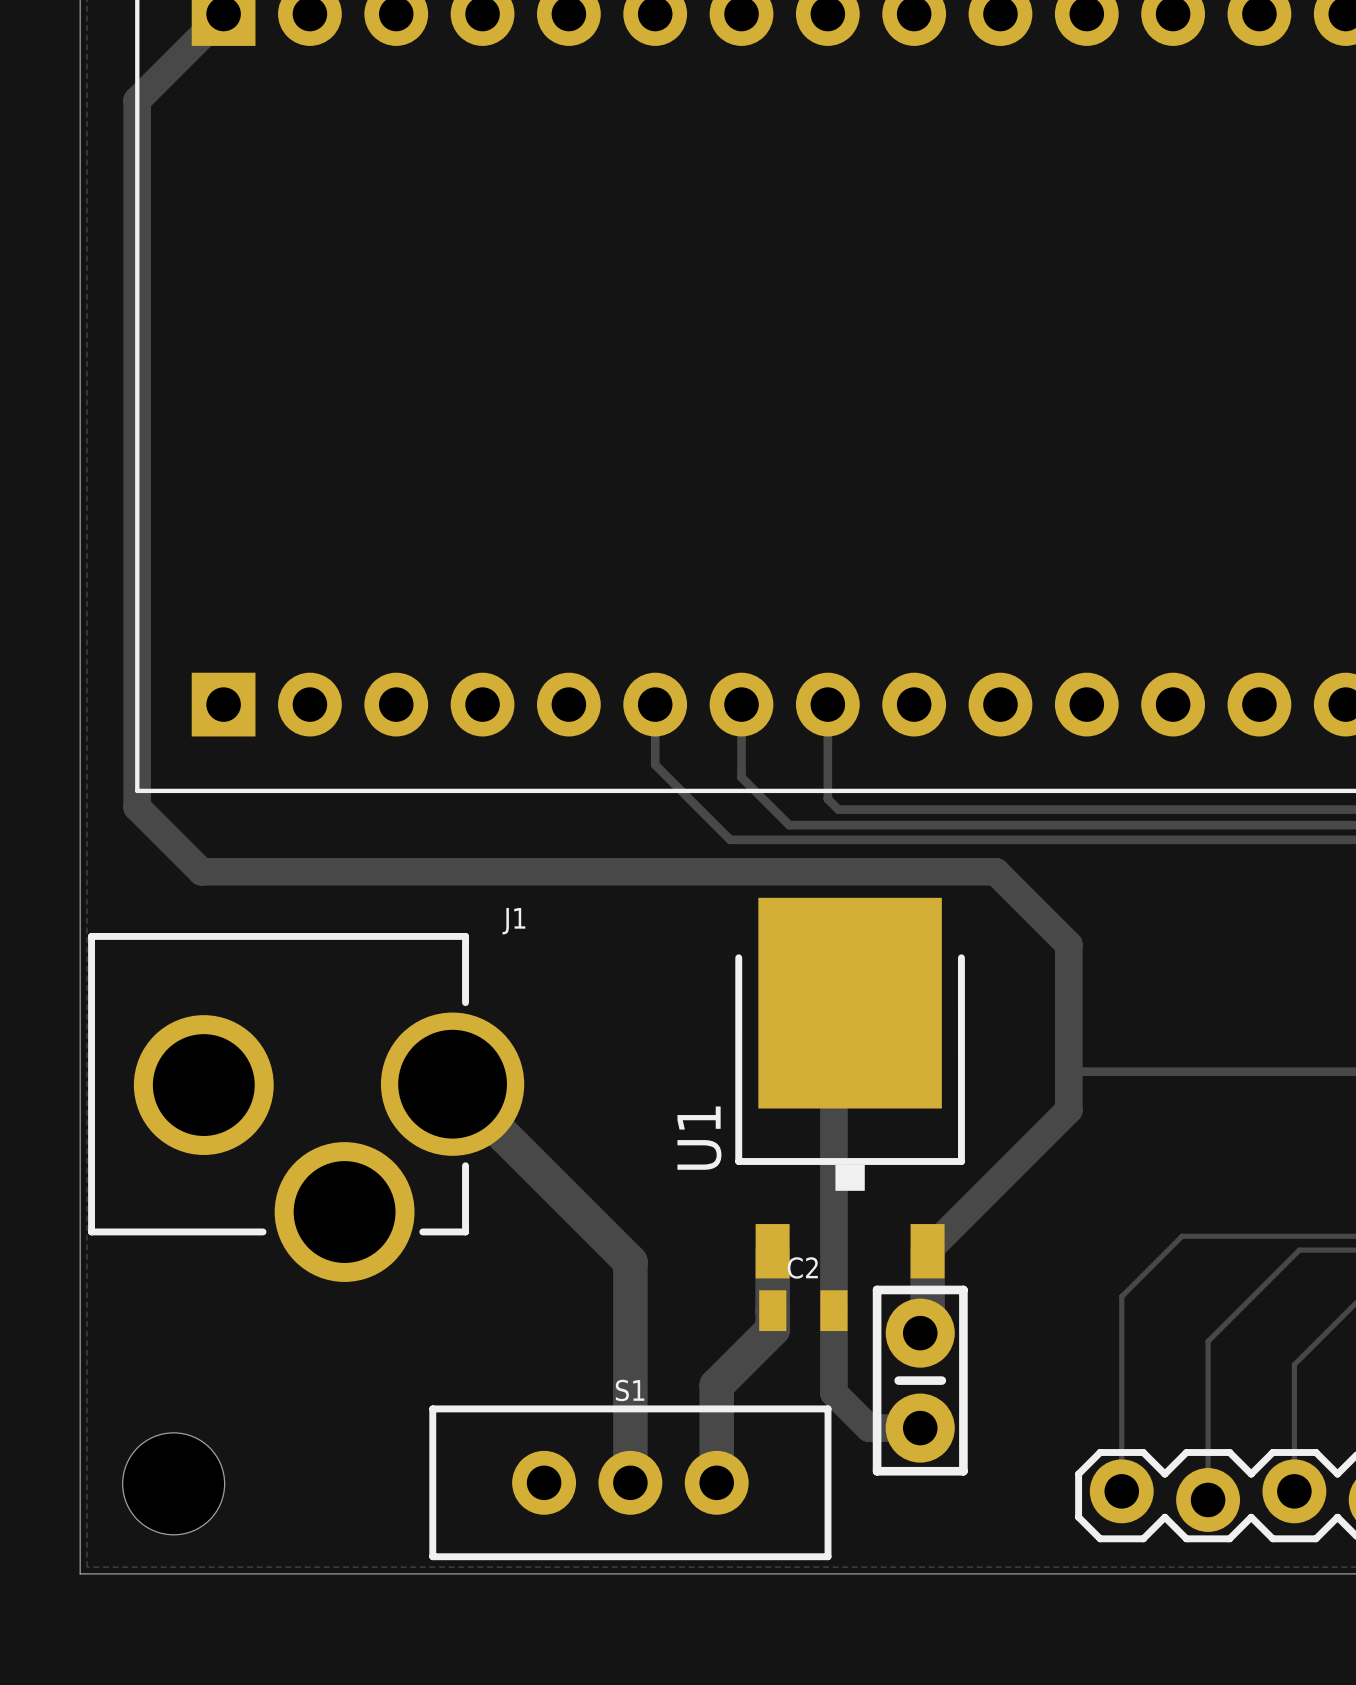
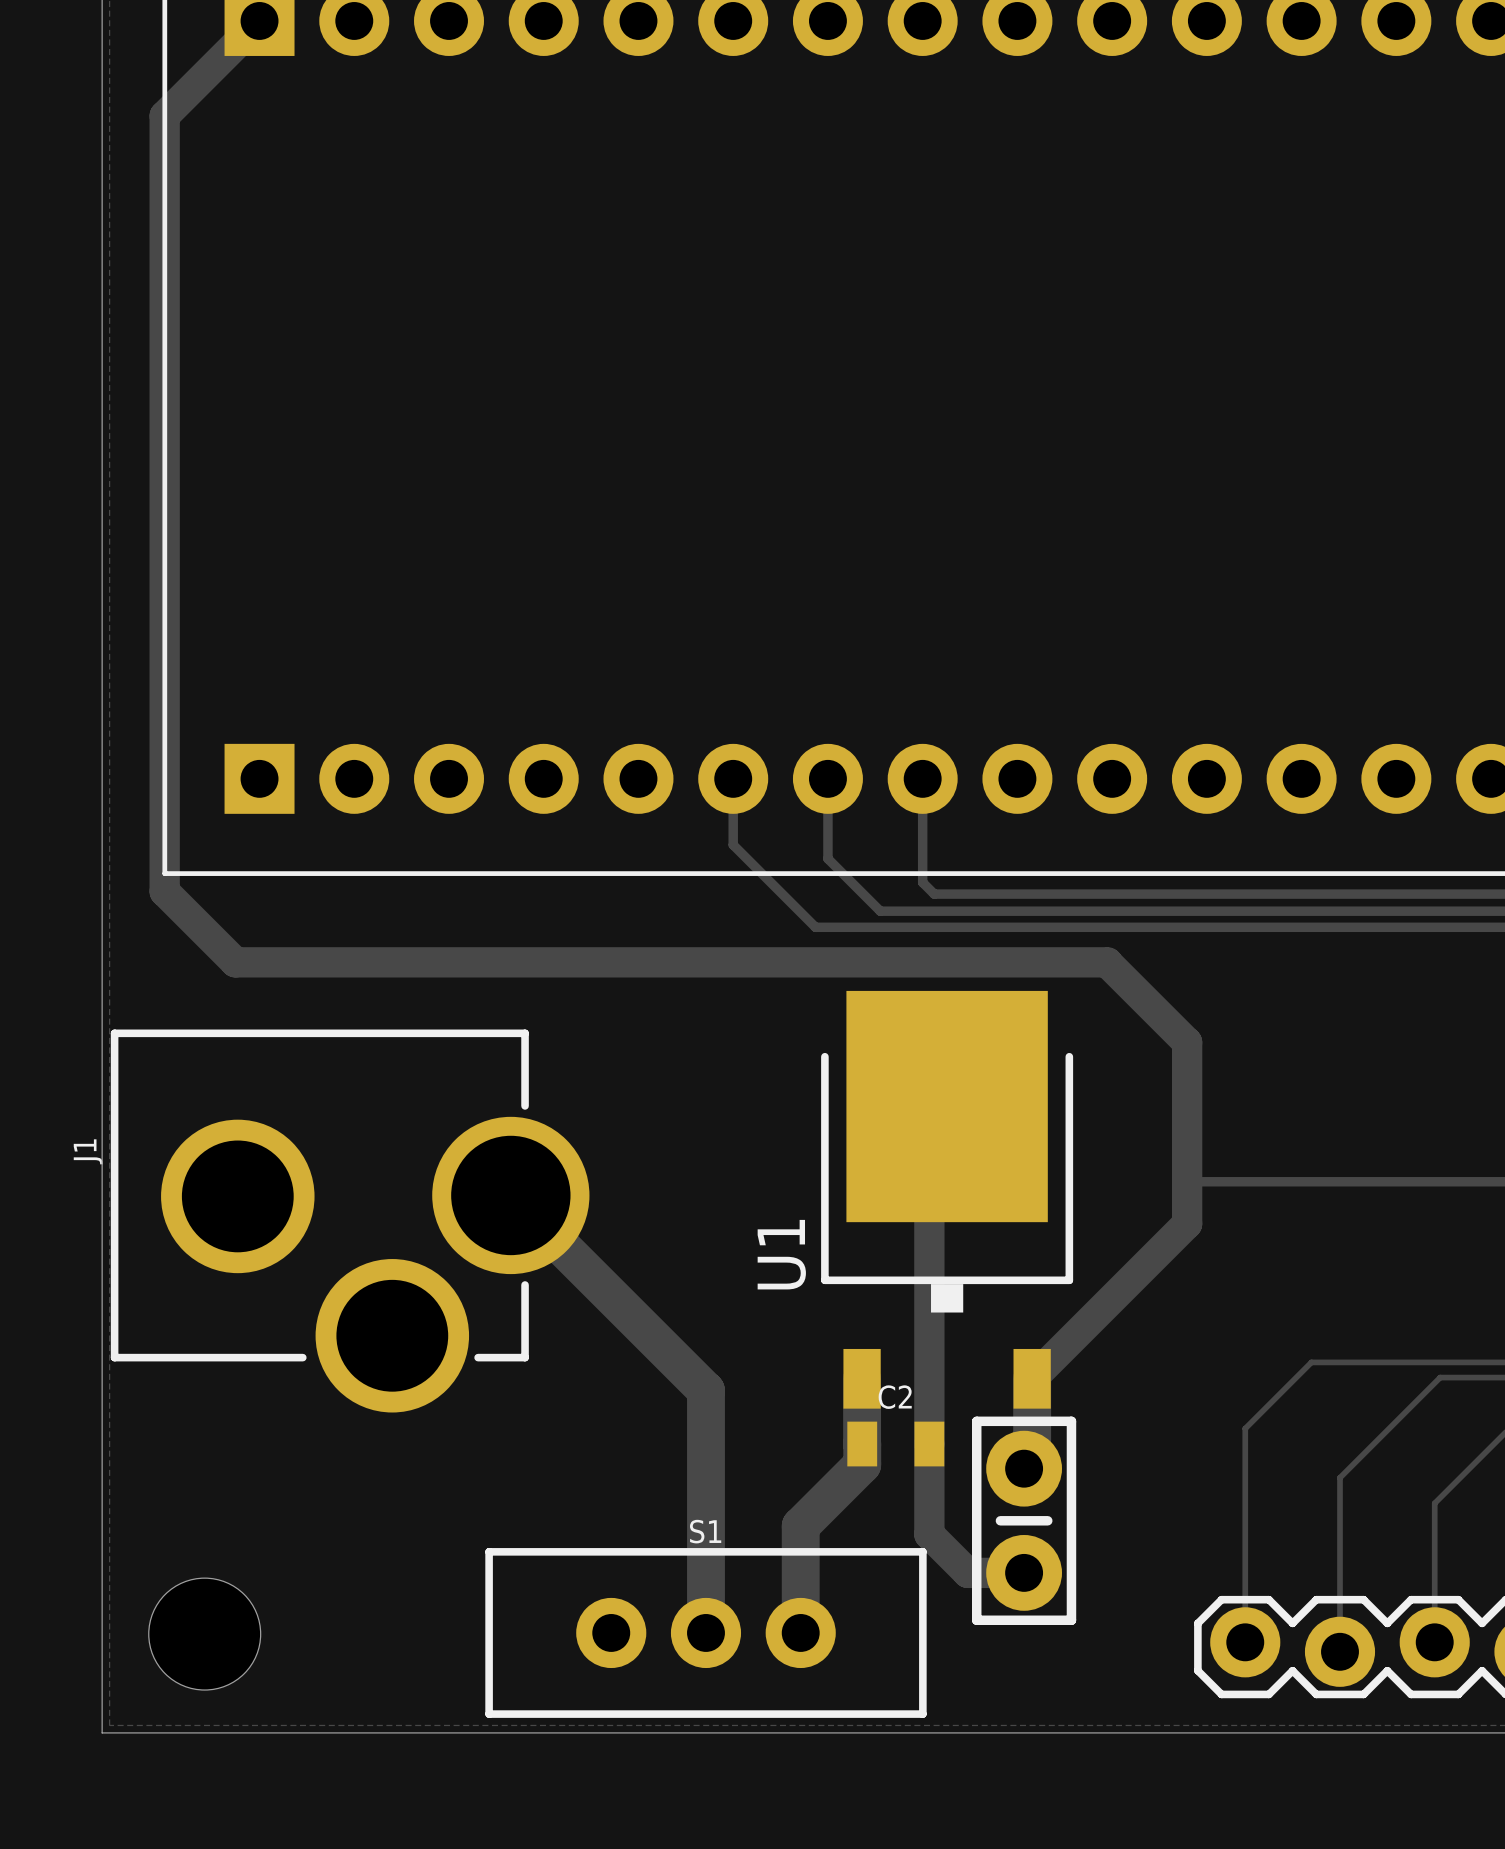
J1 name rotation: 0° (513, 921) -> 90° counterclockwise (88, 1151)
J1 name position: J1 (513, 921) -> J1 (88, 1151)

